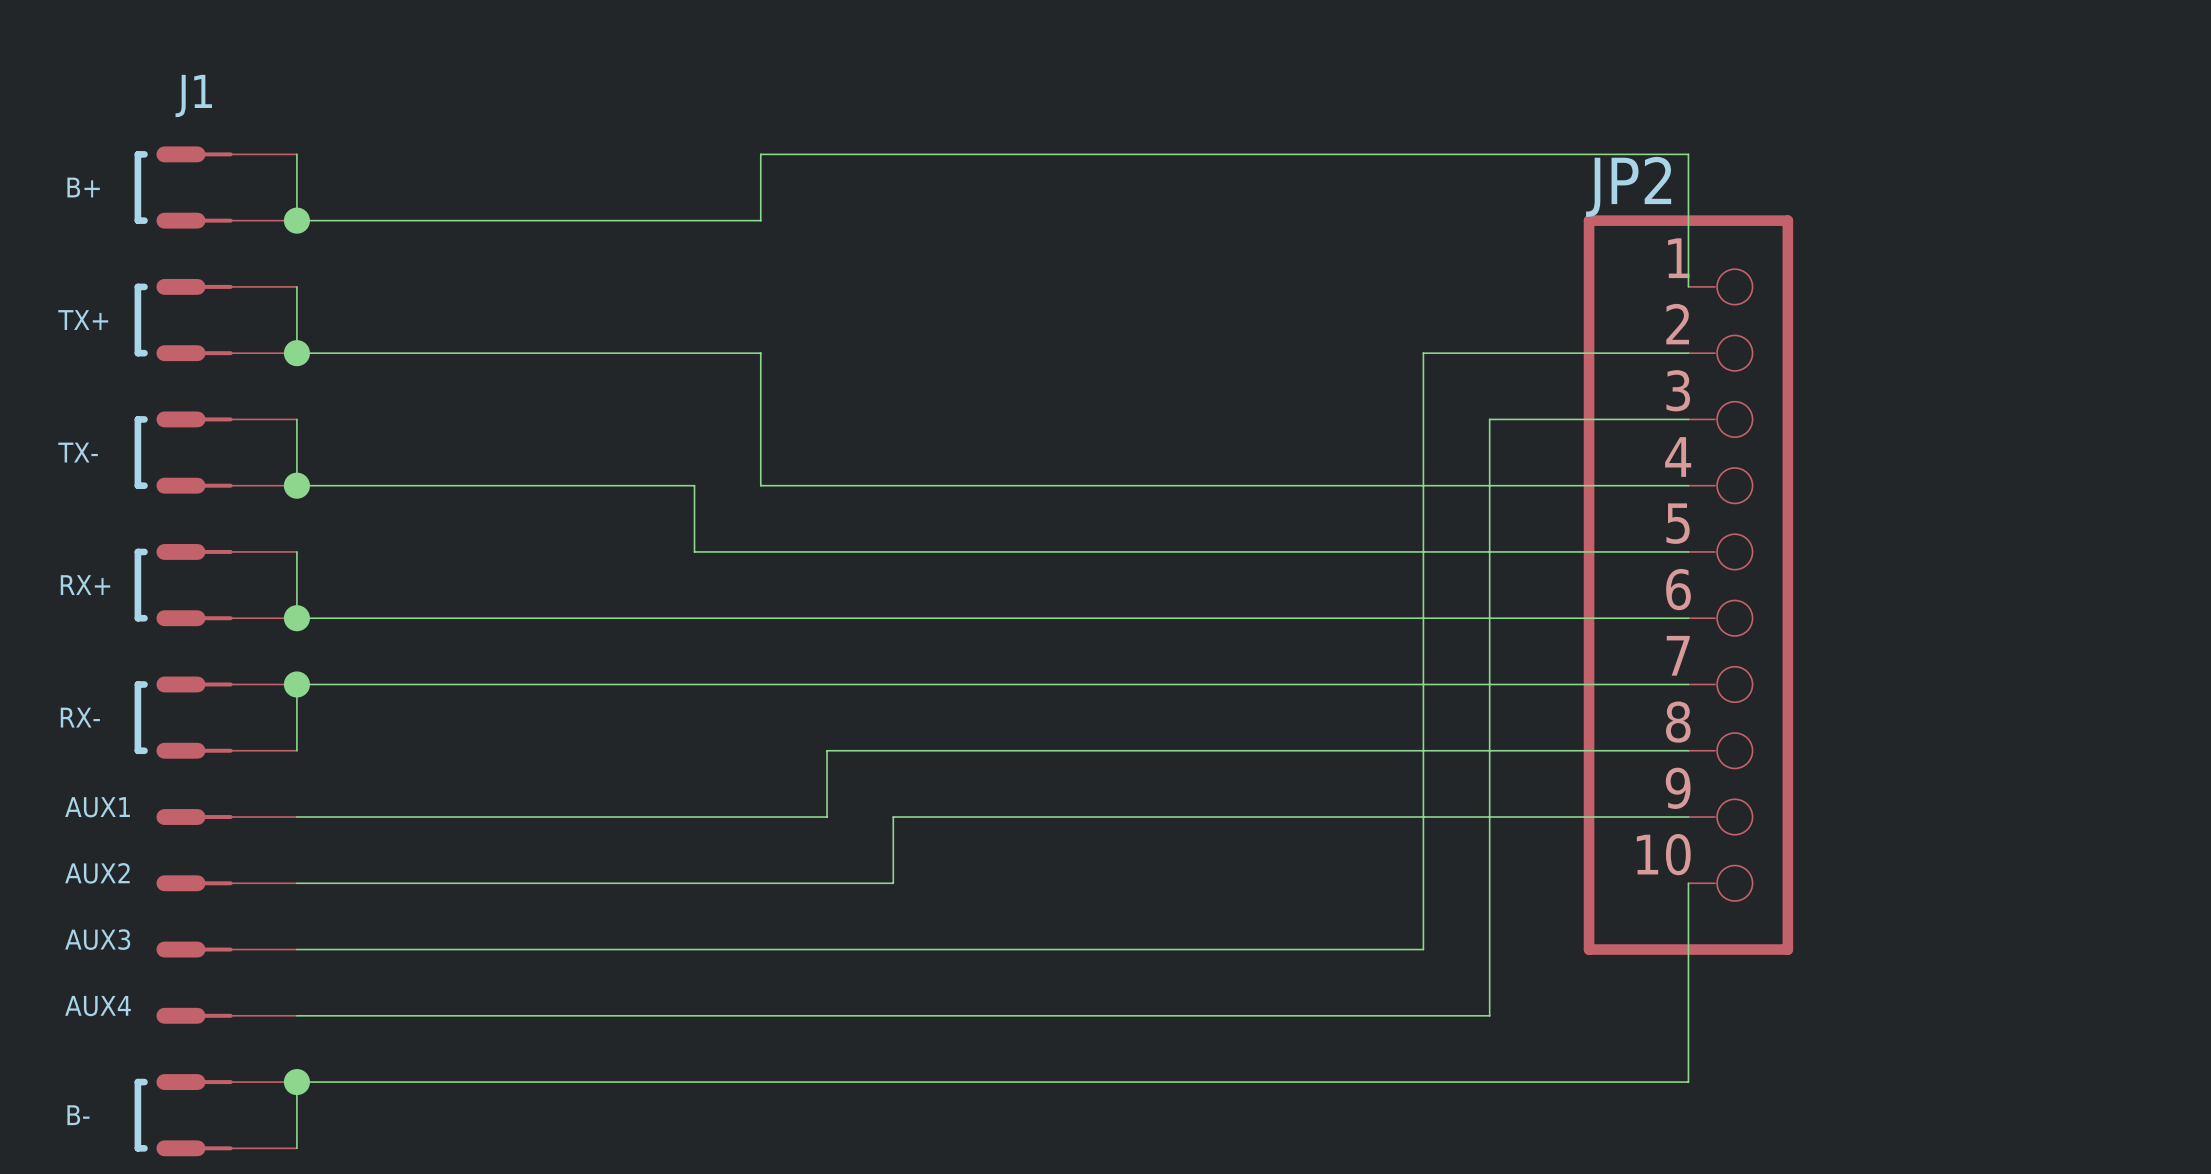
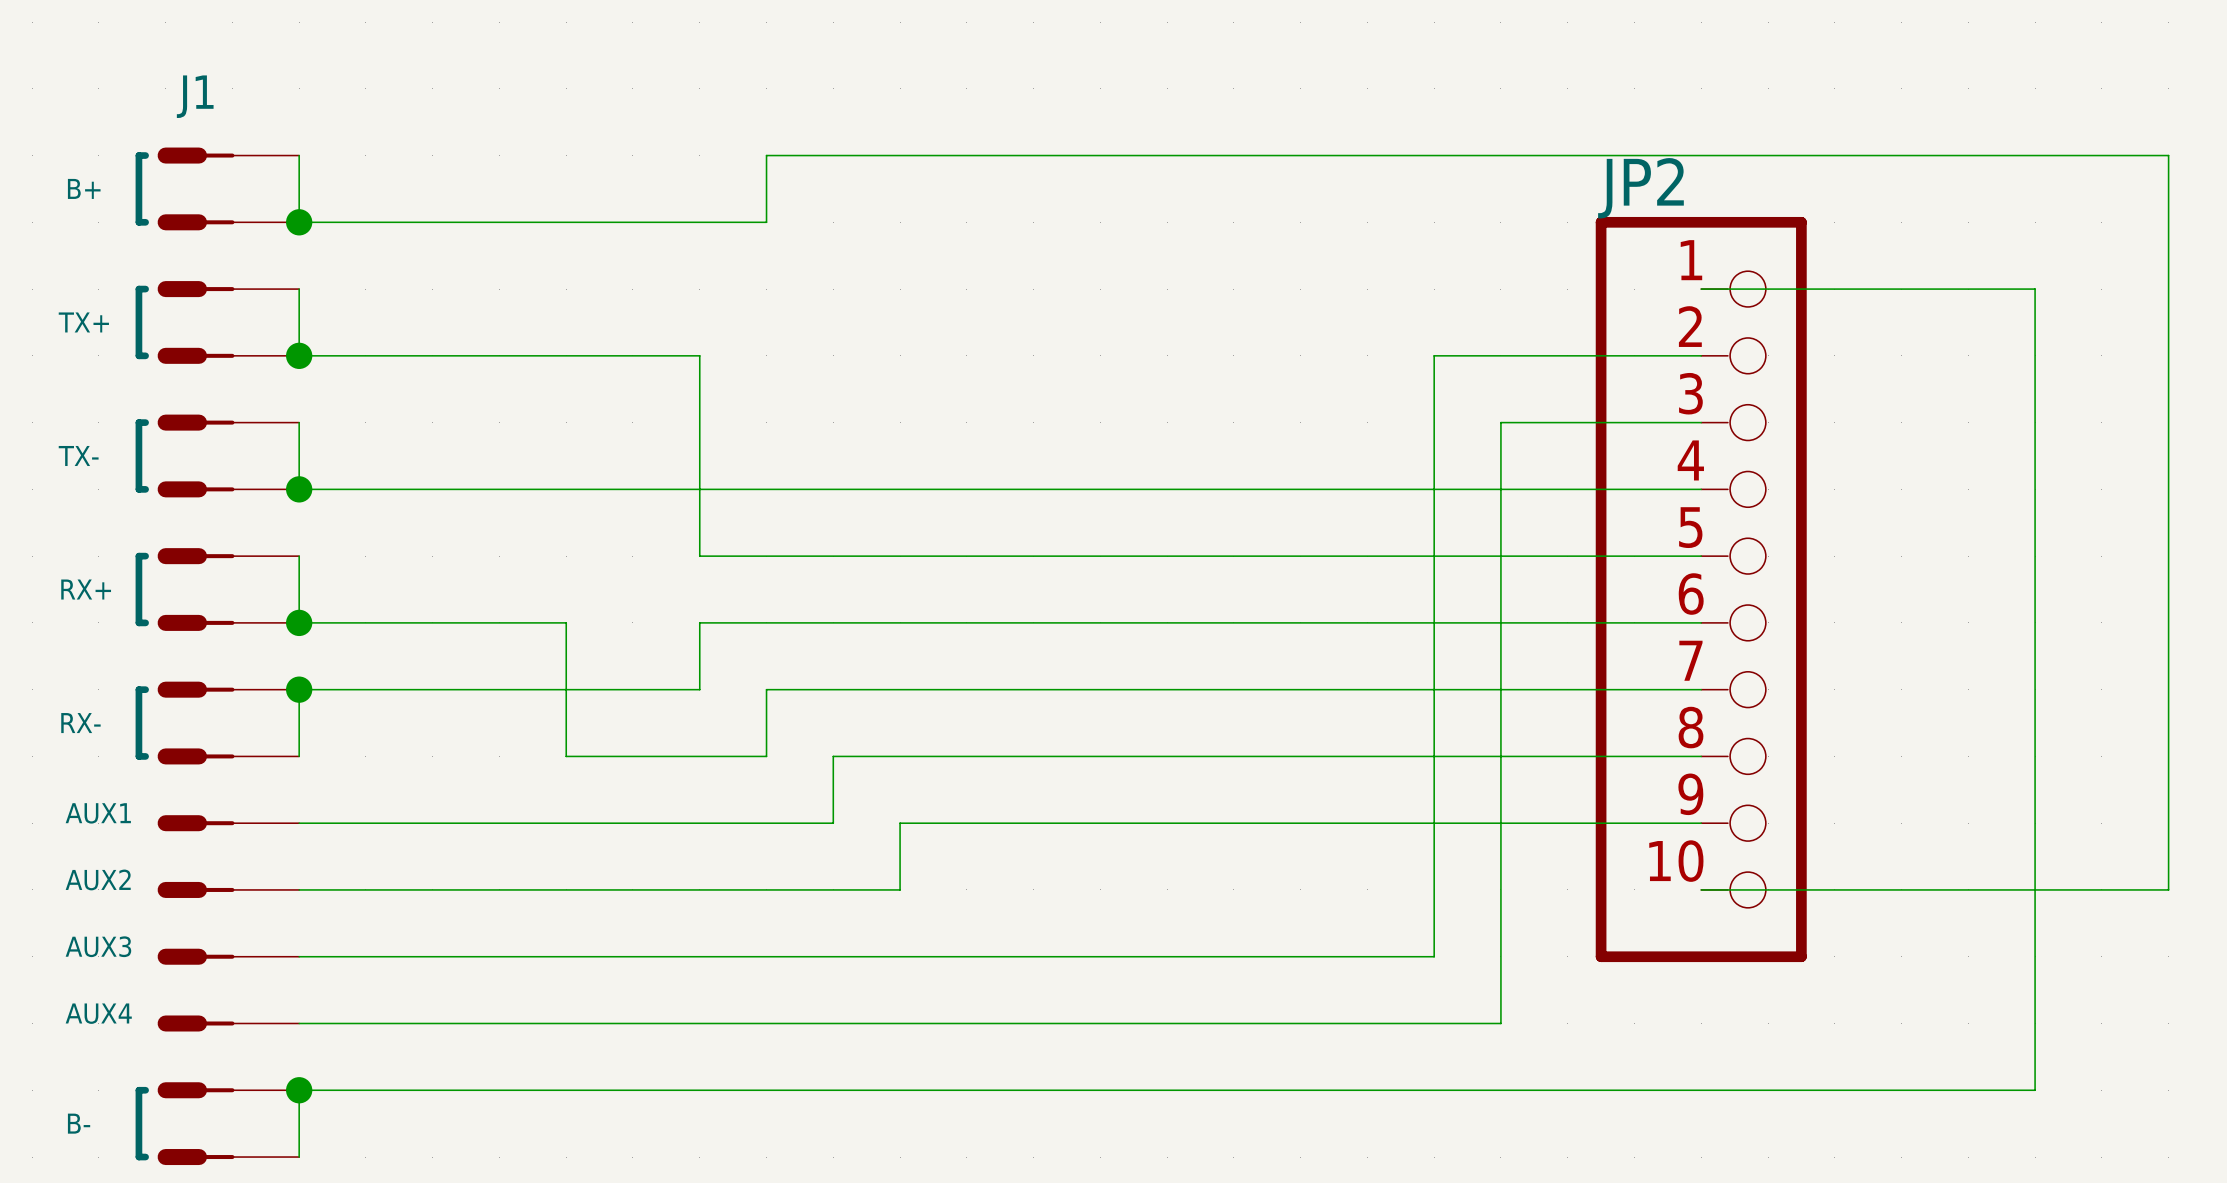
wire: (1688, 154) (1688, 286) -> (1701, 155) (2168, 155) (2168, 889) (1701, 889)
wire: (694, 353) (760, 353) (760, 485) -> (699, 355) (699, 489) (766, 489)
wire: (561, 618) (694, 618) -> (566, 622) (566, 756) (766, 756) (766, 689)
wire: (694, 684) (760, 684) -> (699, 689) (699, 622)
wire: (1688, 883) (1688, 1082) -> (1701, 289) (2035, 289) (2035, 1090) (1701, 1090)

